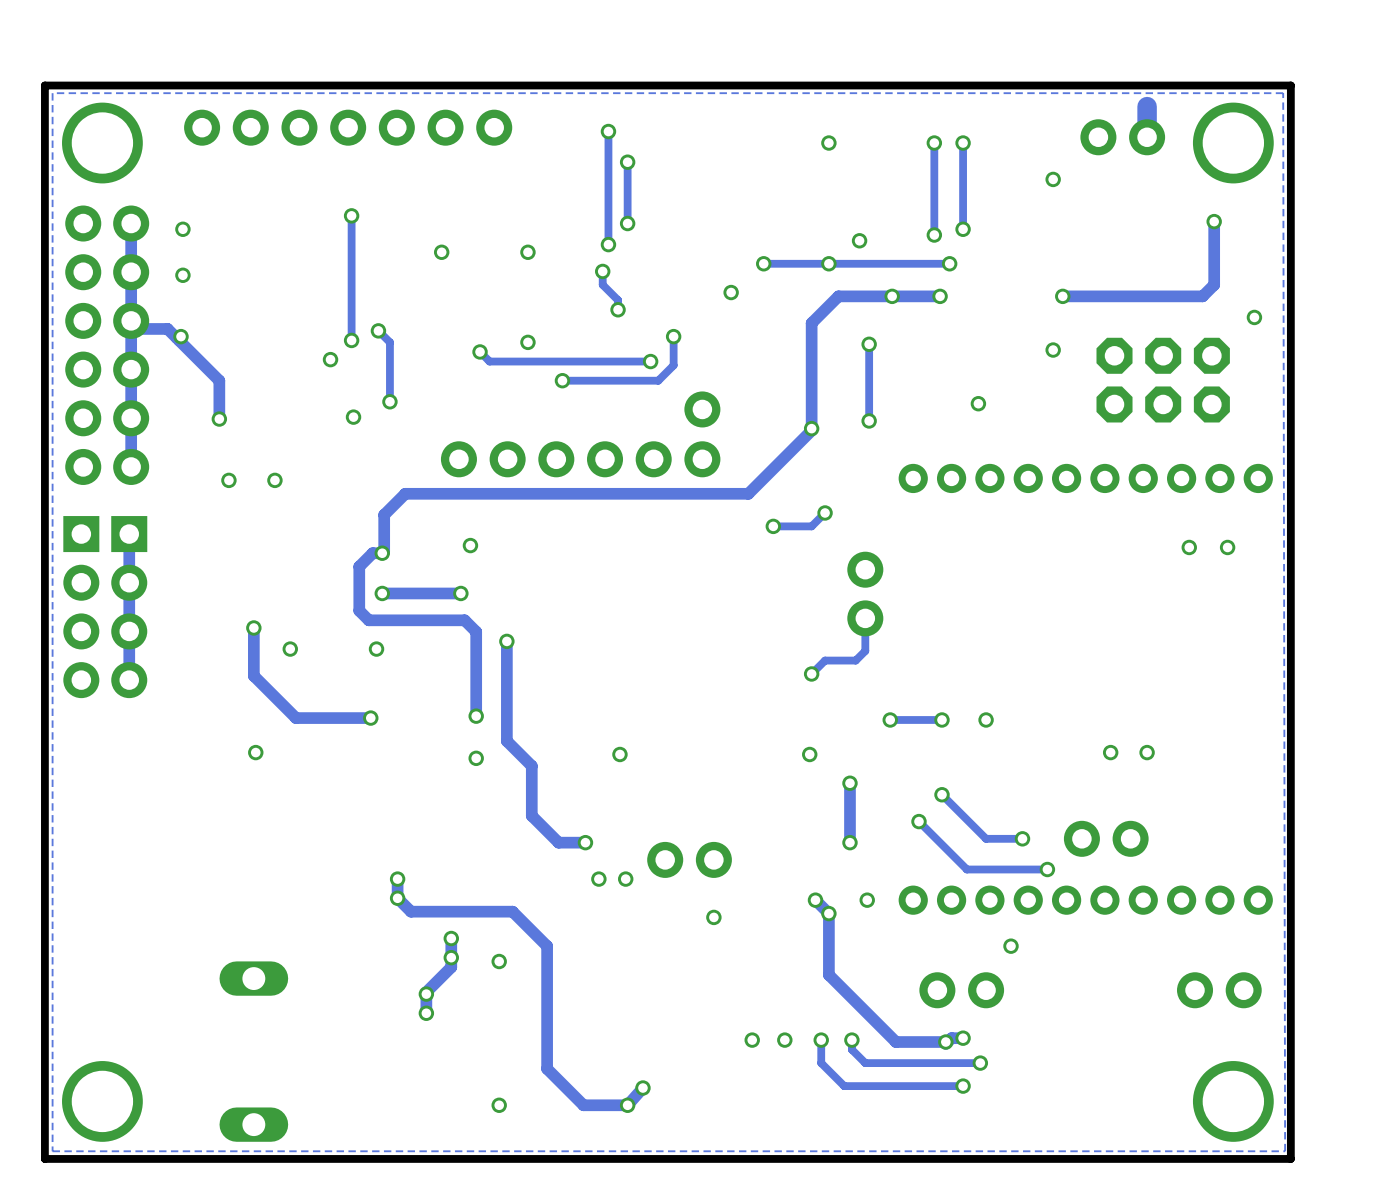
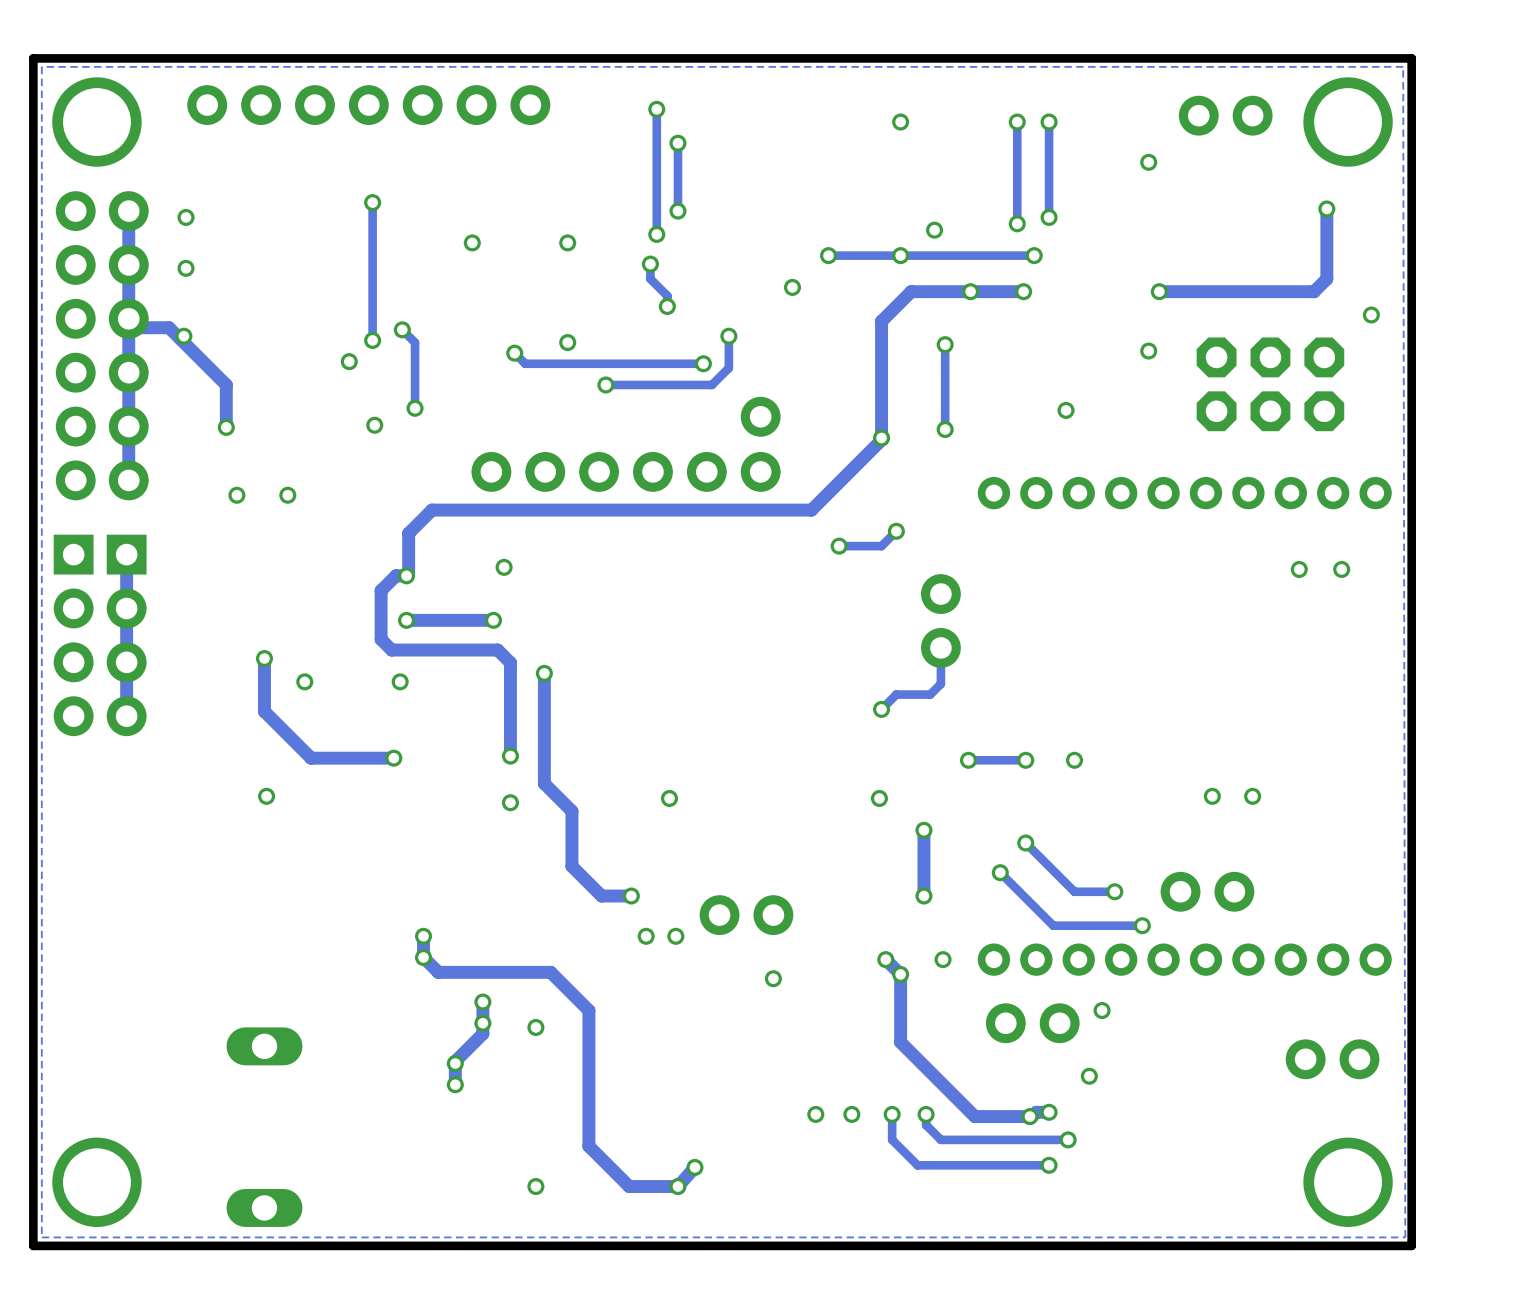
track: (1147, 106) (1147, 137) -> none
part position: (961, 990) -> (1032, 1023)
via: none -> (1089, 1076)

